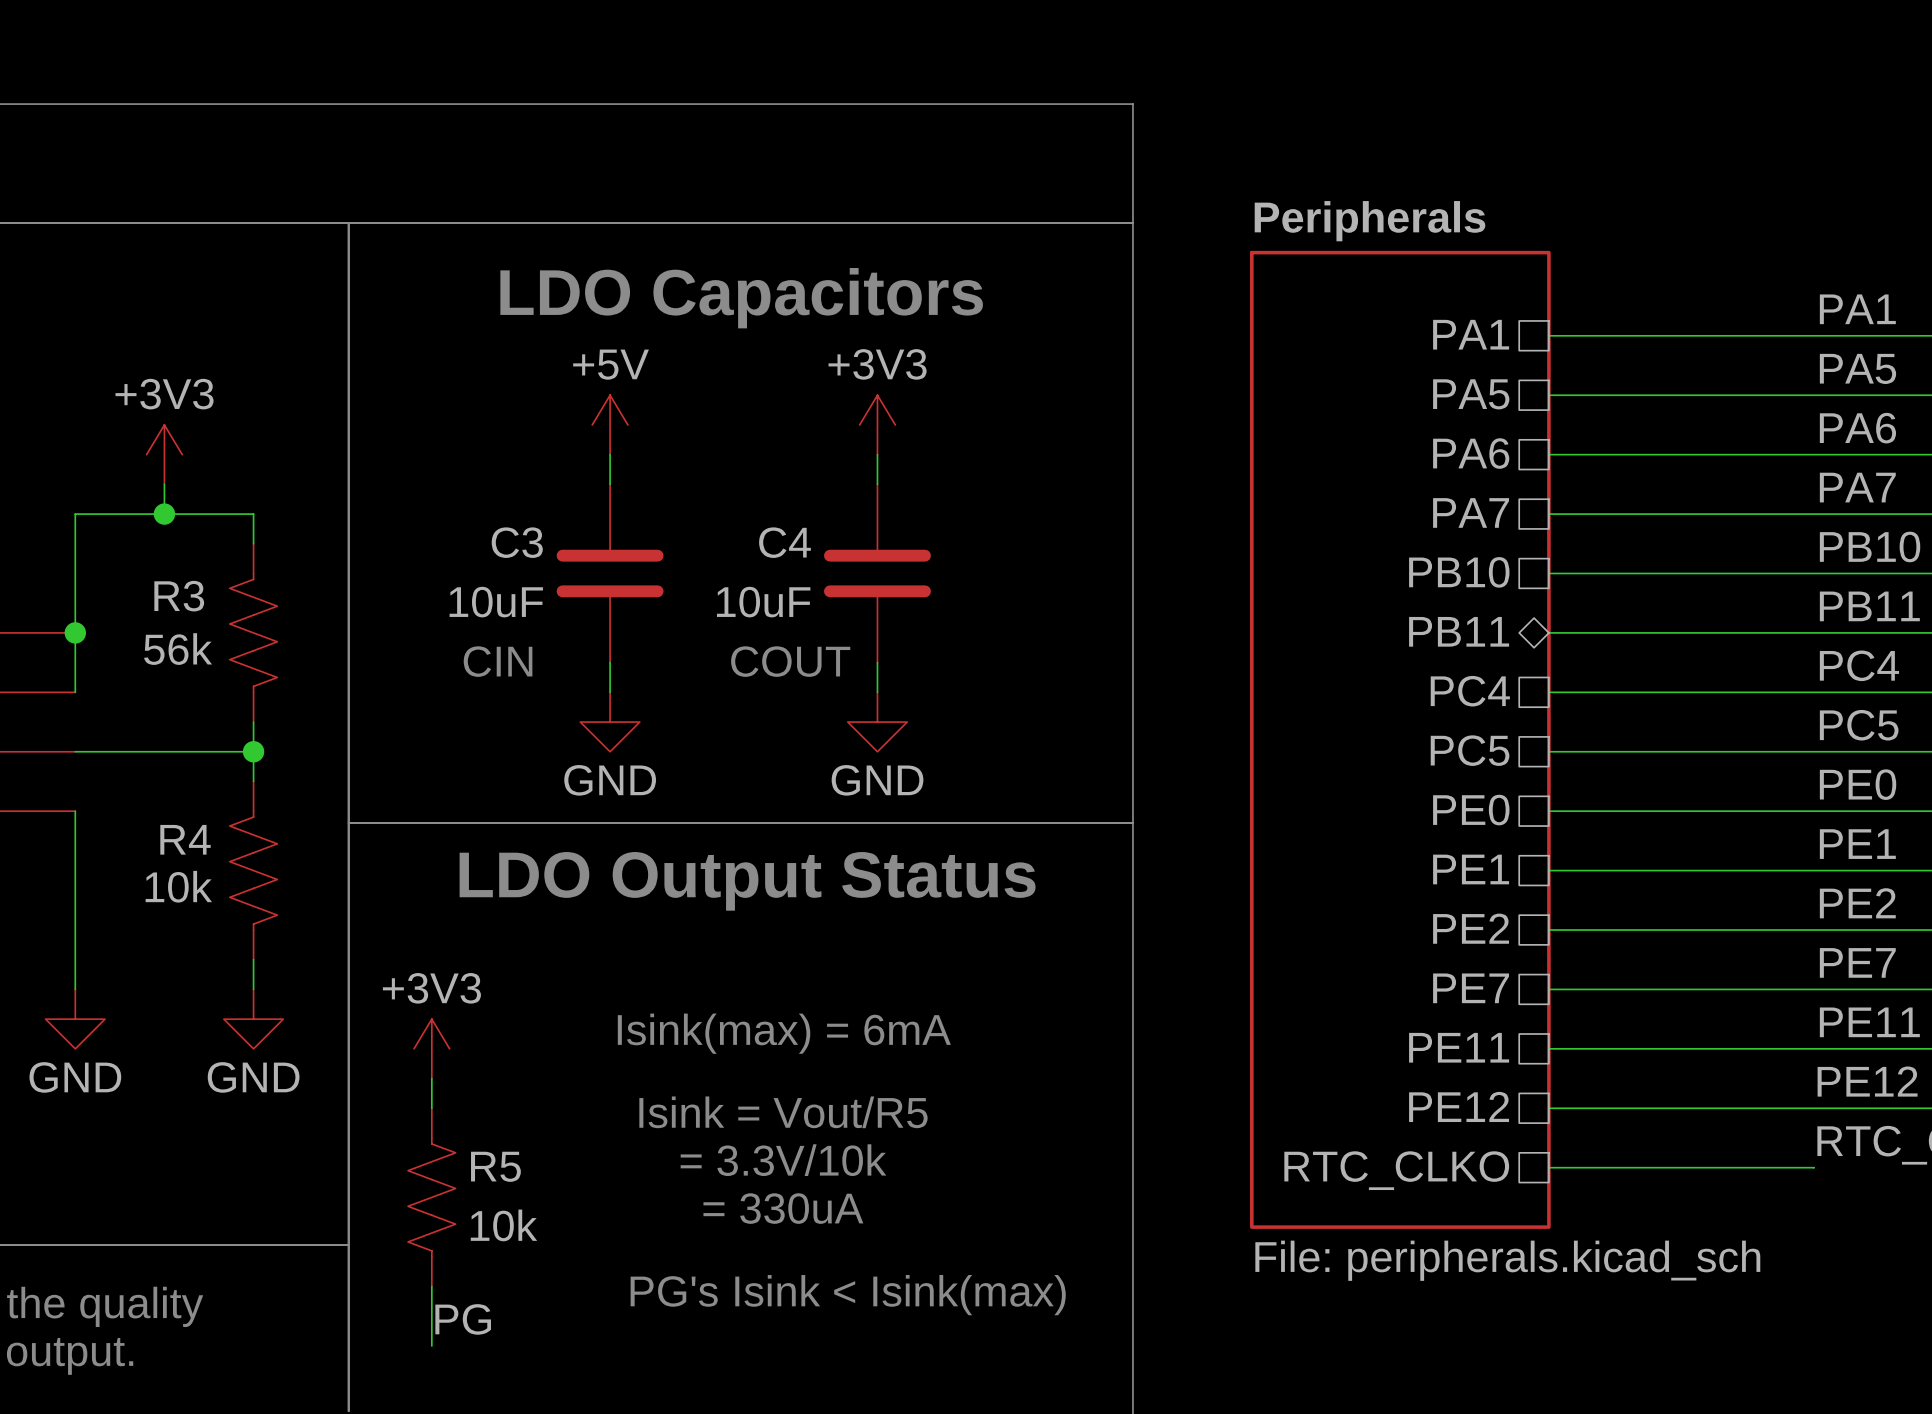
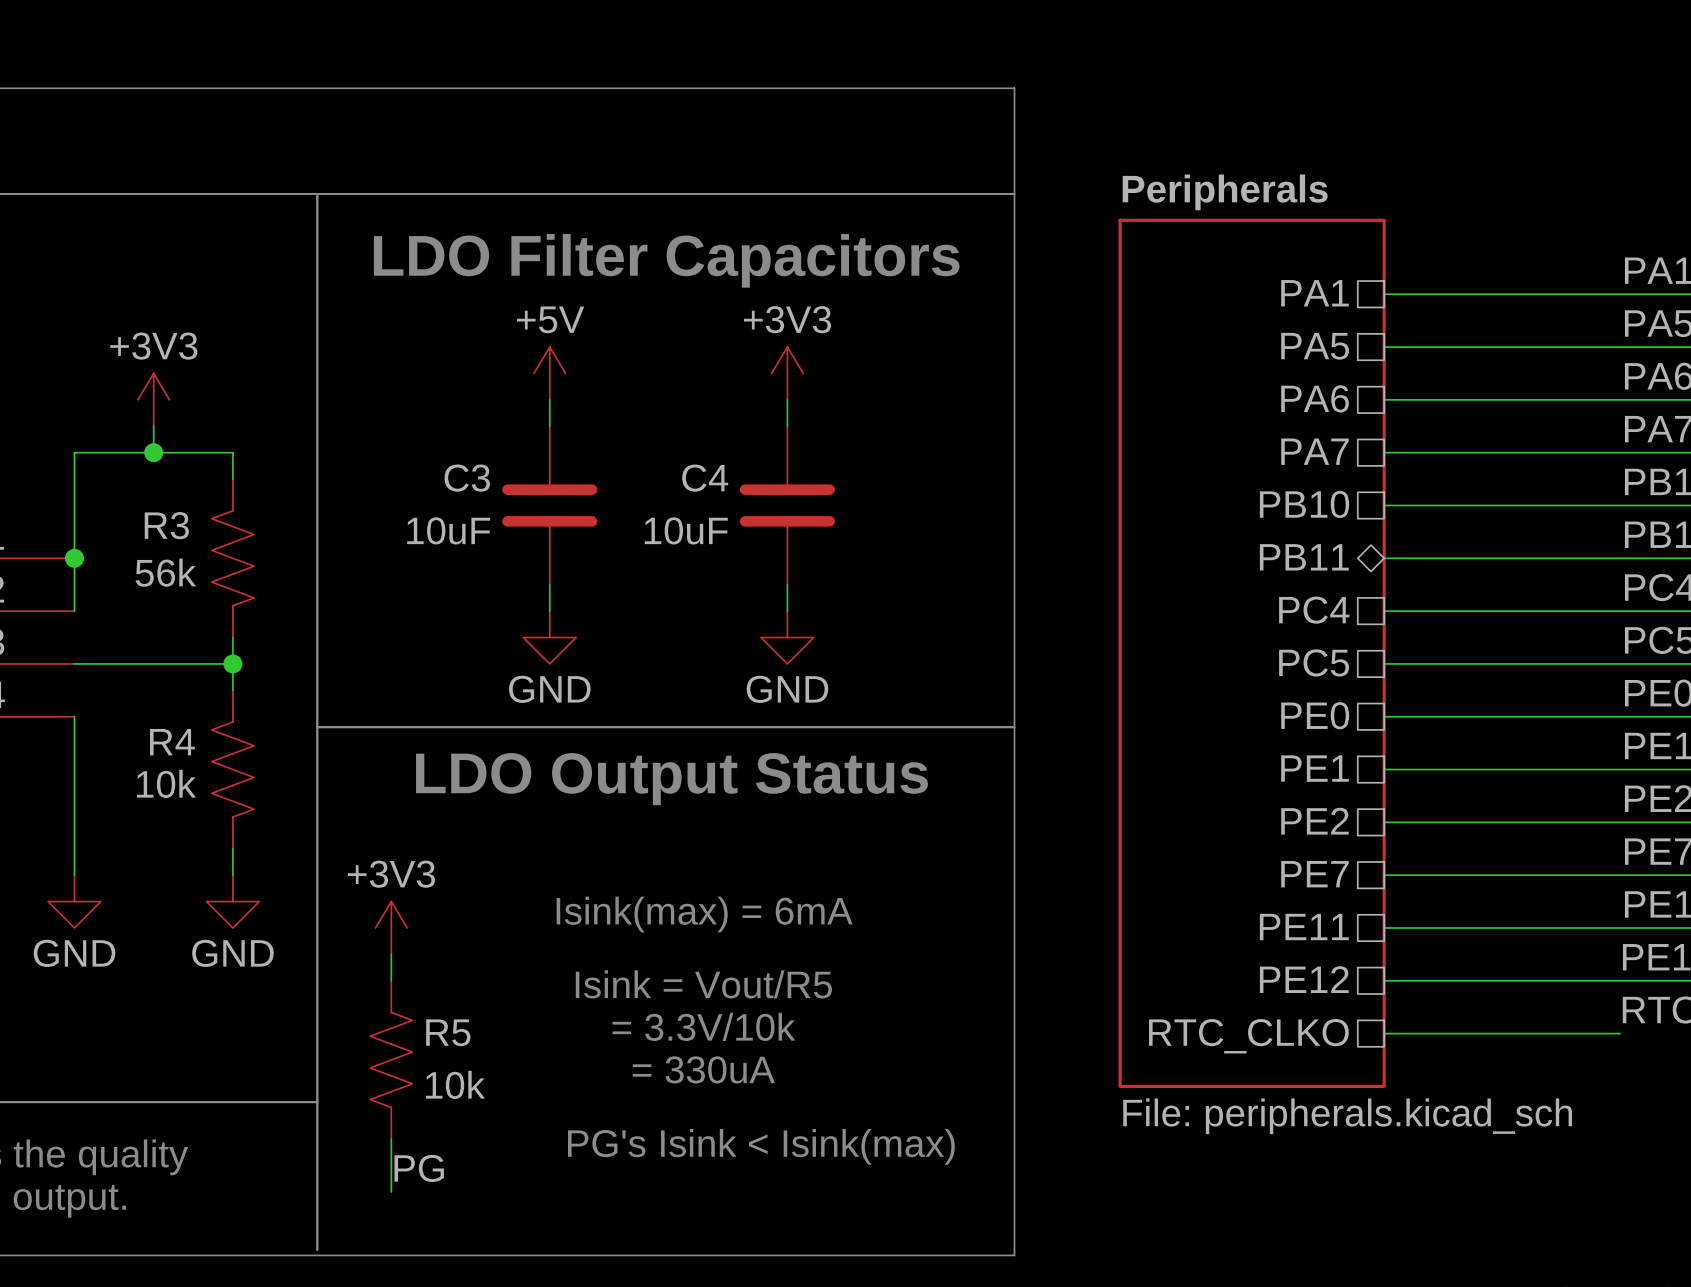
text: LDO Capacitors (741, 298) -> LDO Filter Capacitors (666, 260)
text: CIN (498, 661) -> none
text: COUT (790, 661) -> none

